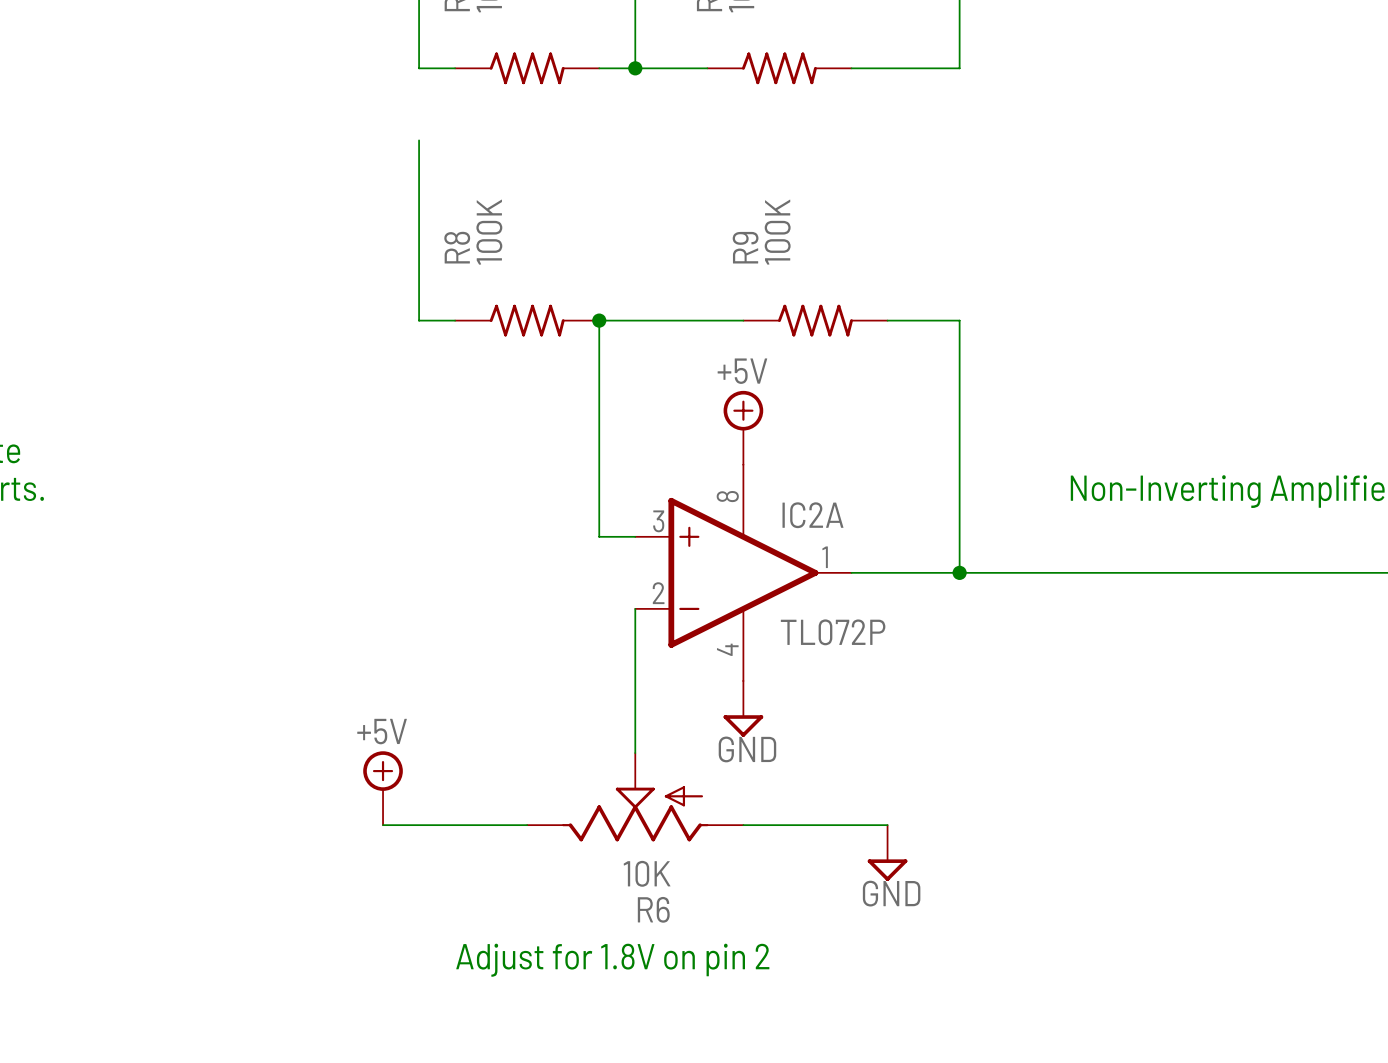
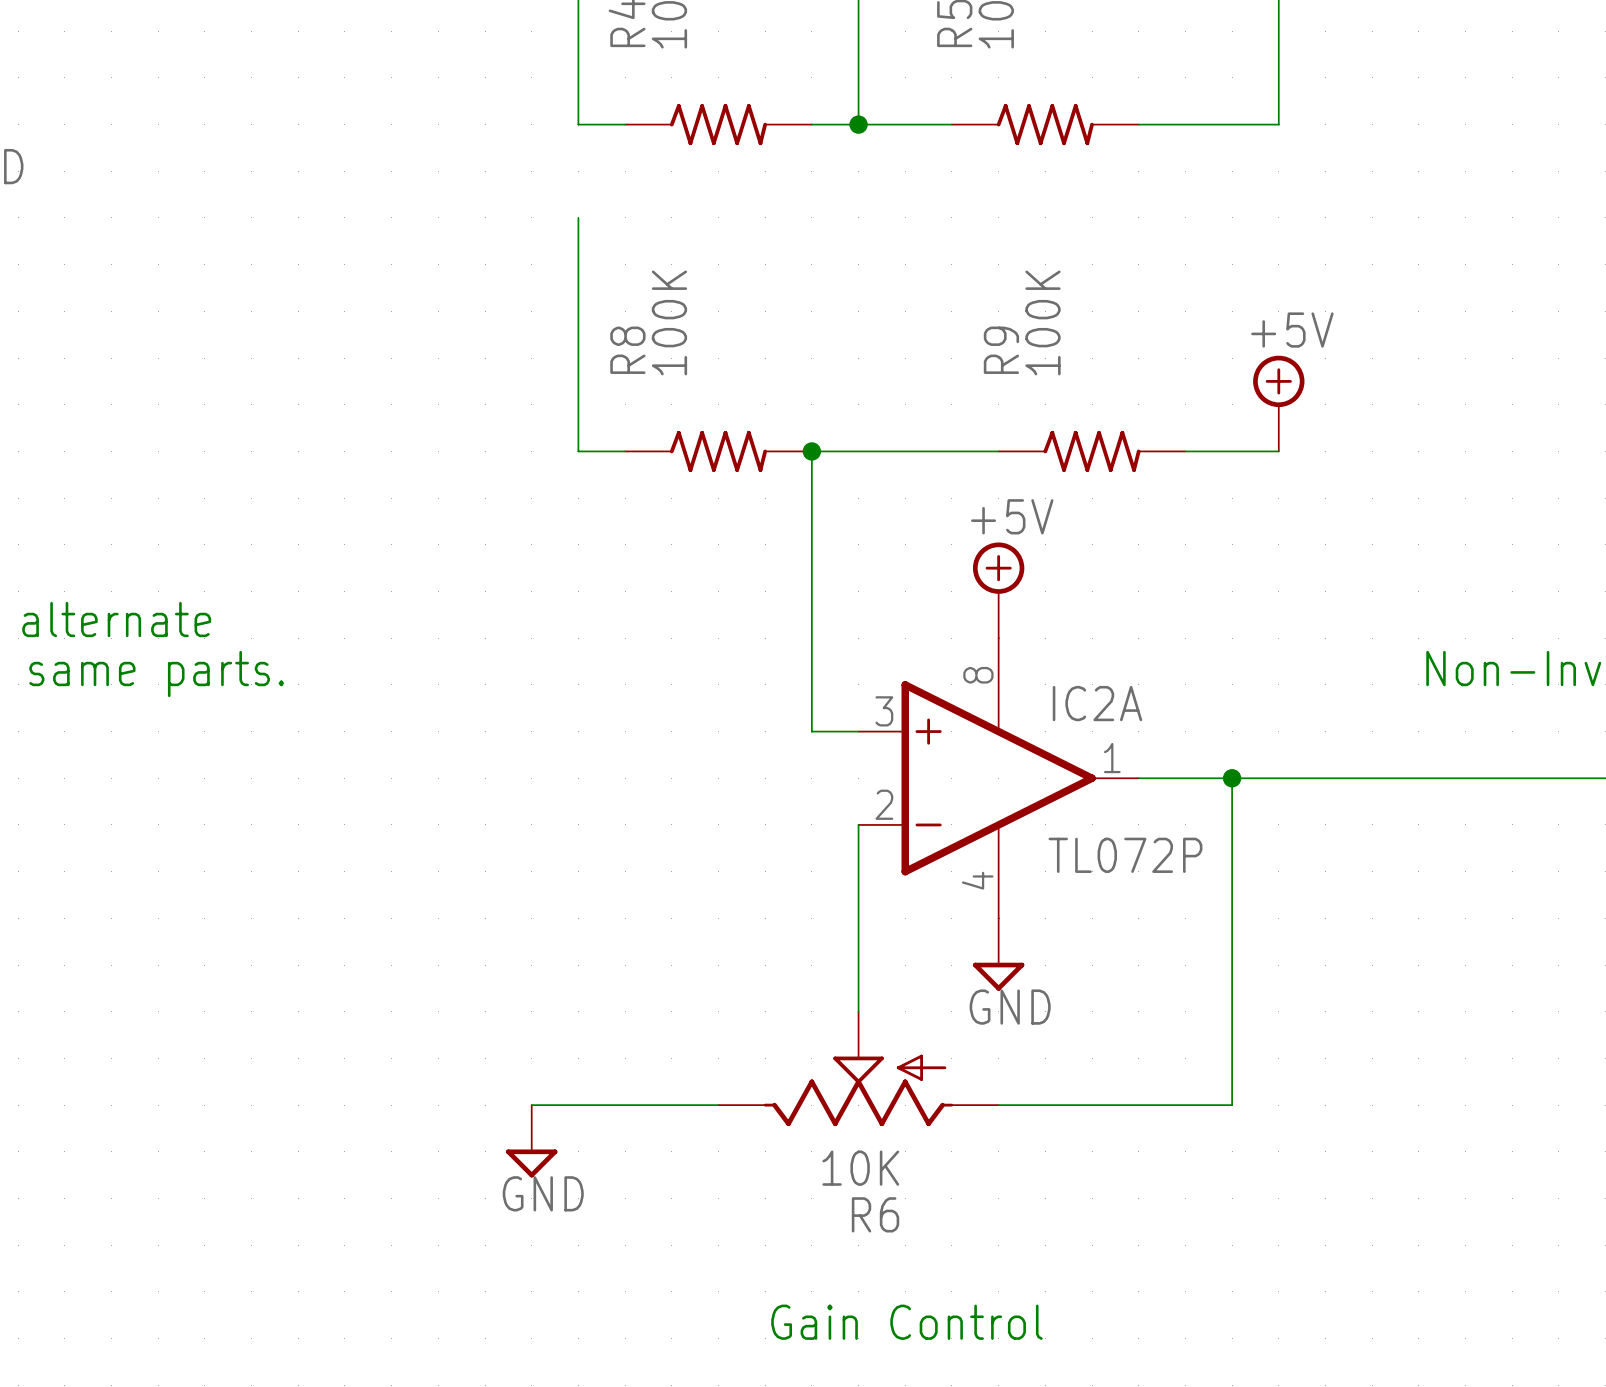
power symbol: none -> +5V (1278, 403)
wire: (959, 320) (959, 572) -> none
wire: none -> (1232, 778) (1232, 1105) (1185, 1105)
junction position: (959, 572) -> (1232, 778)
power symbol: +5V (383, 788) -> none
power symbol: none -> GND (531, 1141)
power symbol: GND (887, 853) -> none
text: Adjust for 1.8V on pin 2 (612, 960) -> none
text: none -> Gain Control (906, 1322)

